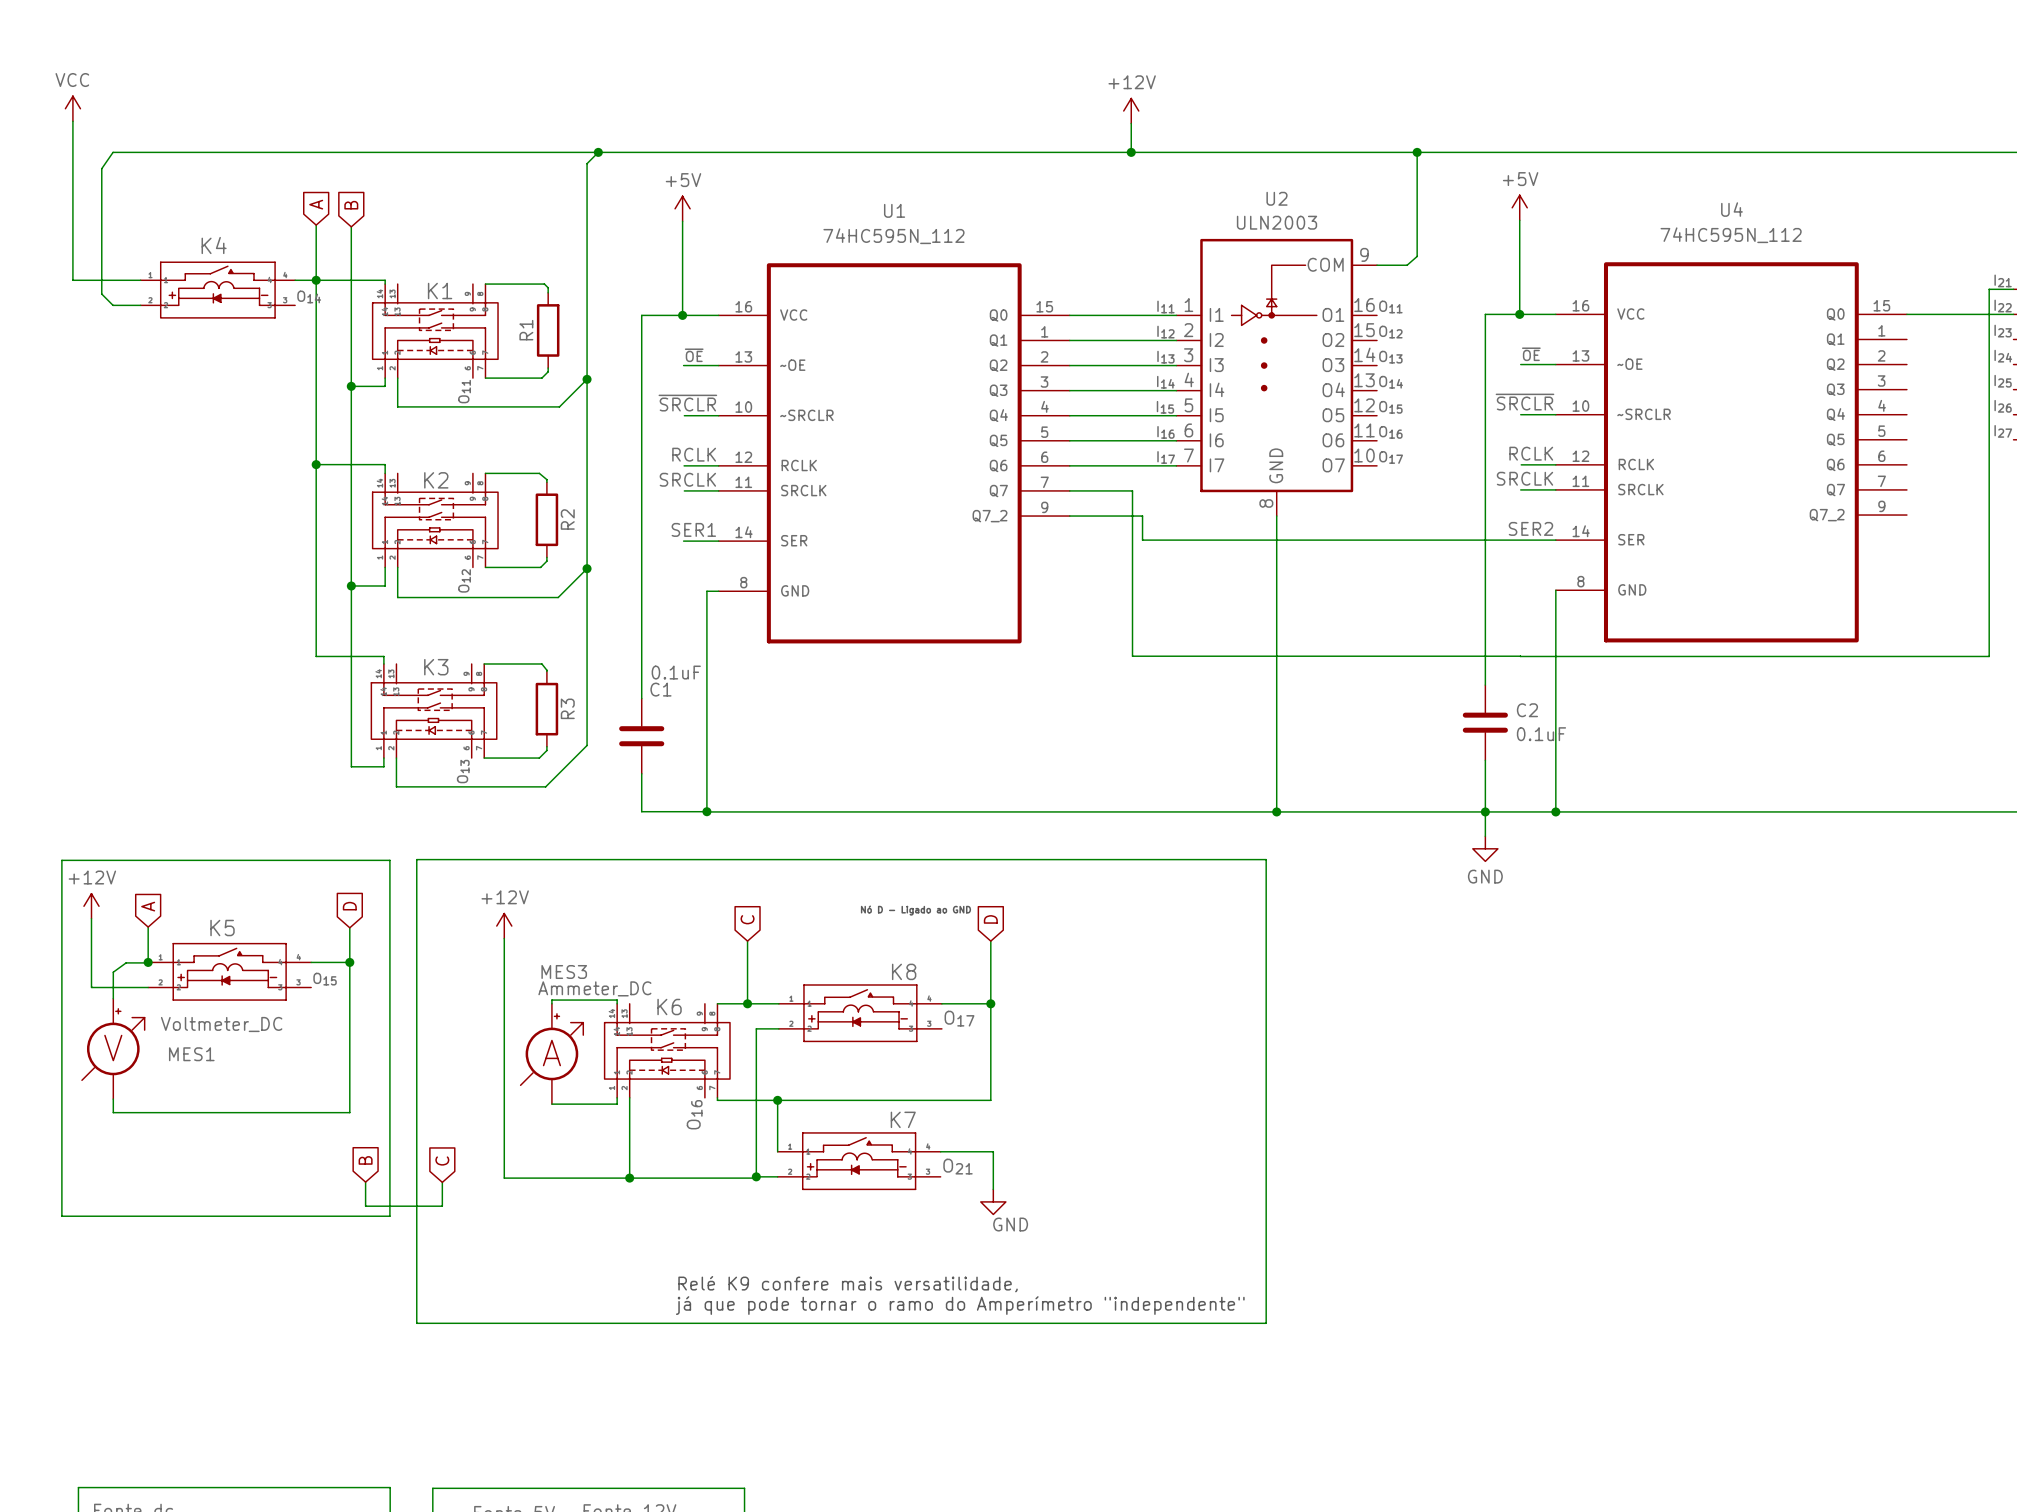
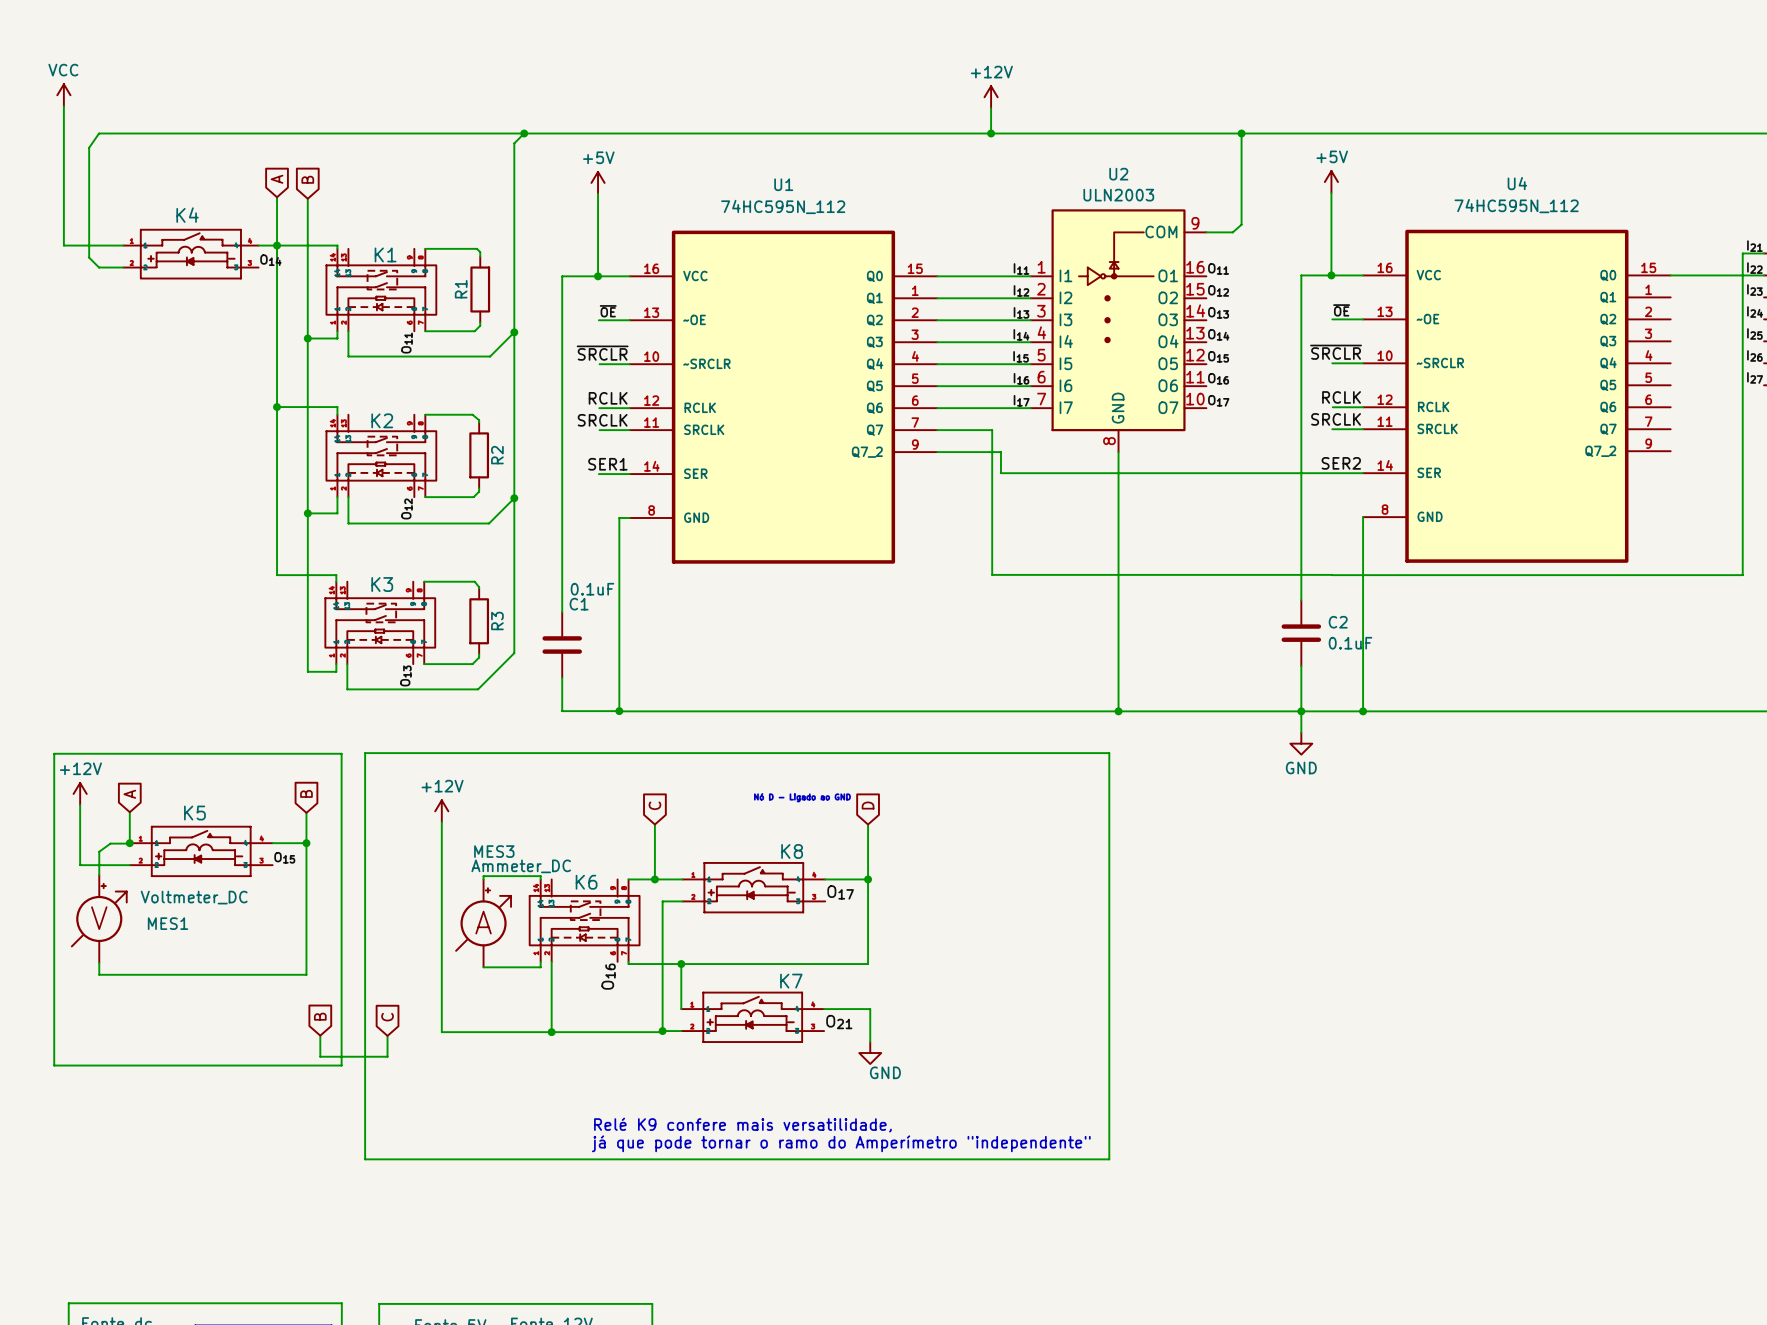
global label: D (349, 906) -> B (306, 793)

